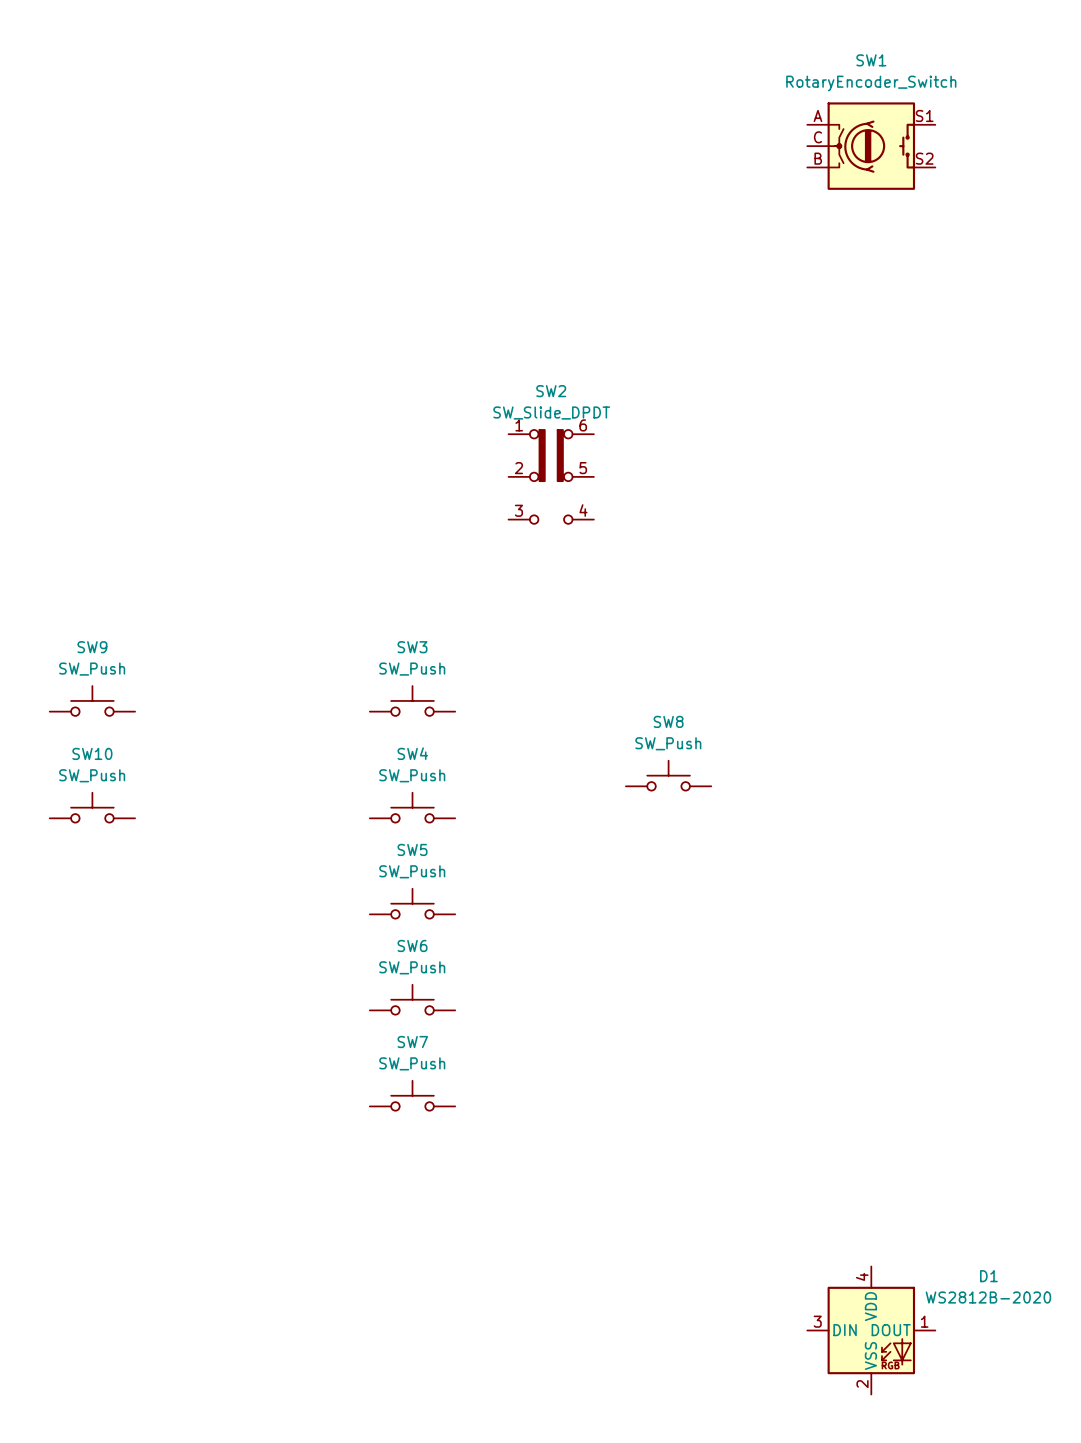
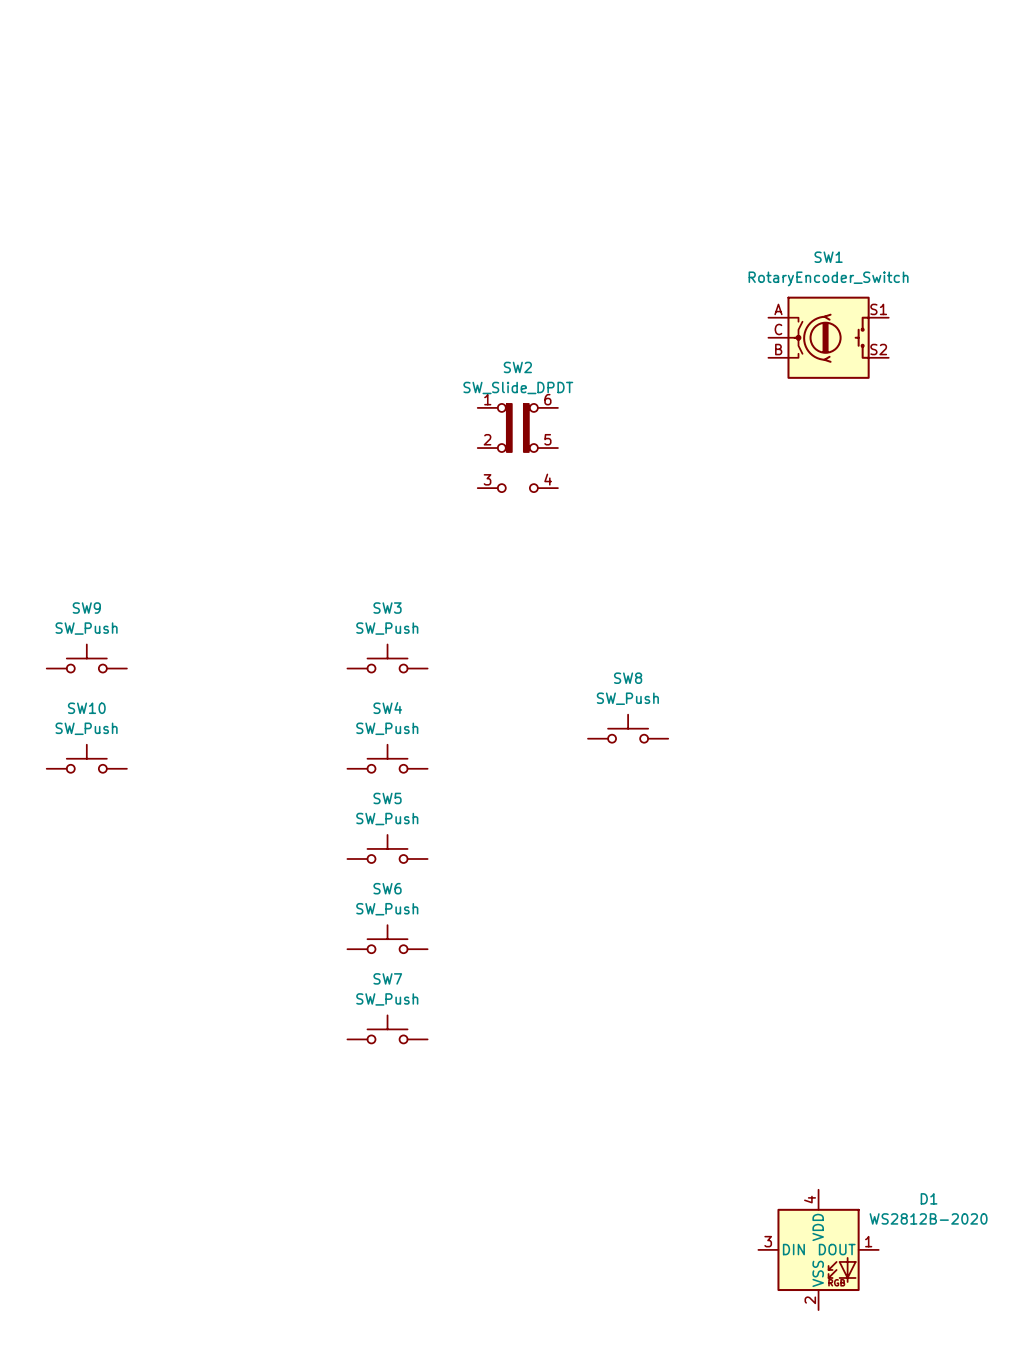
SW1 position: (871, 146) -> (828, 337)

